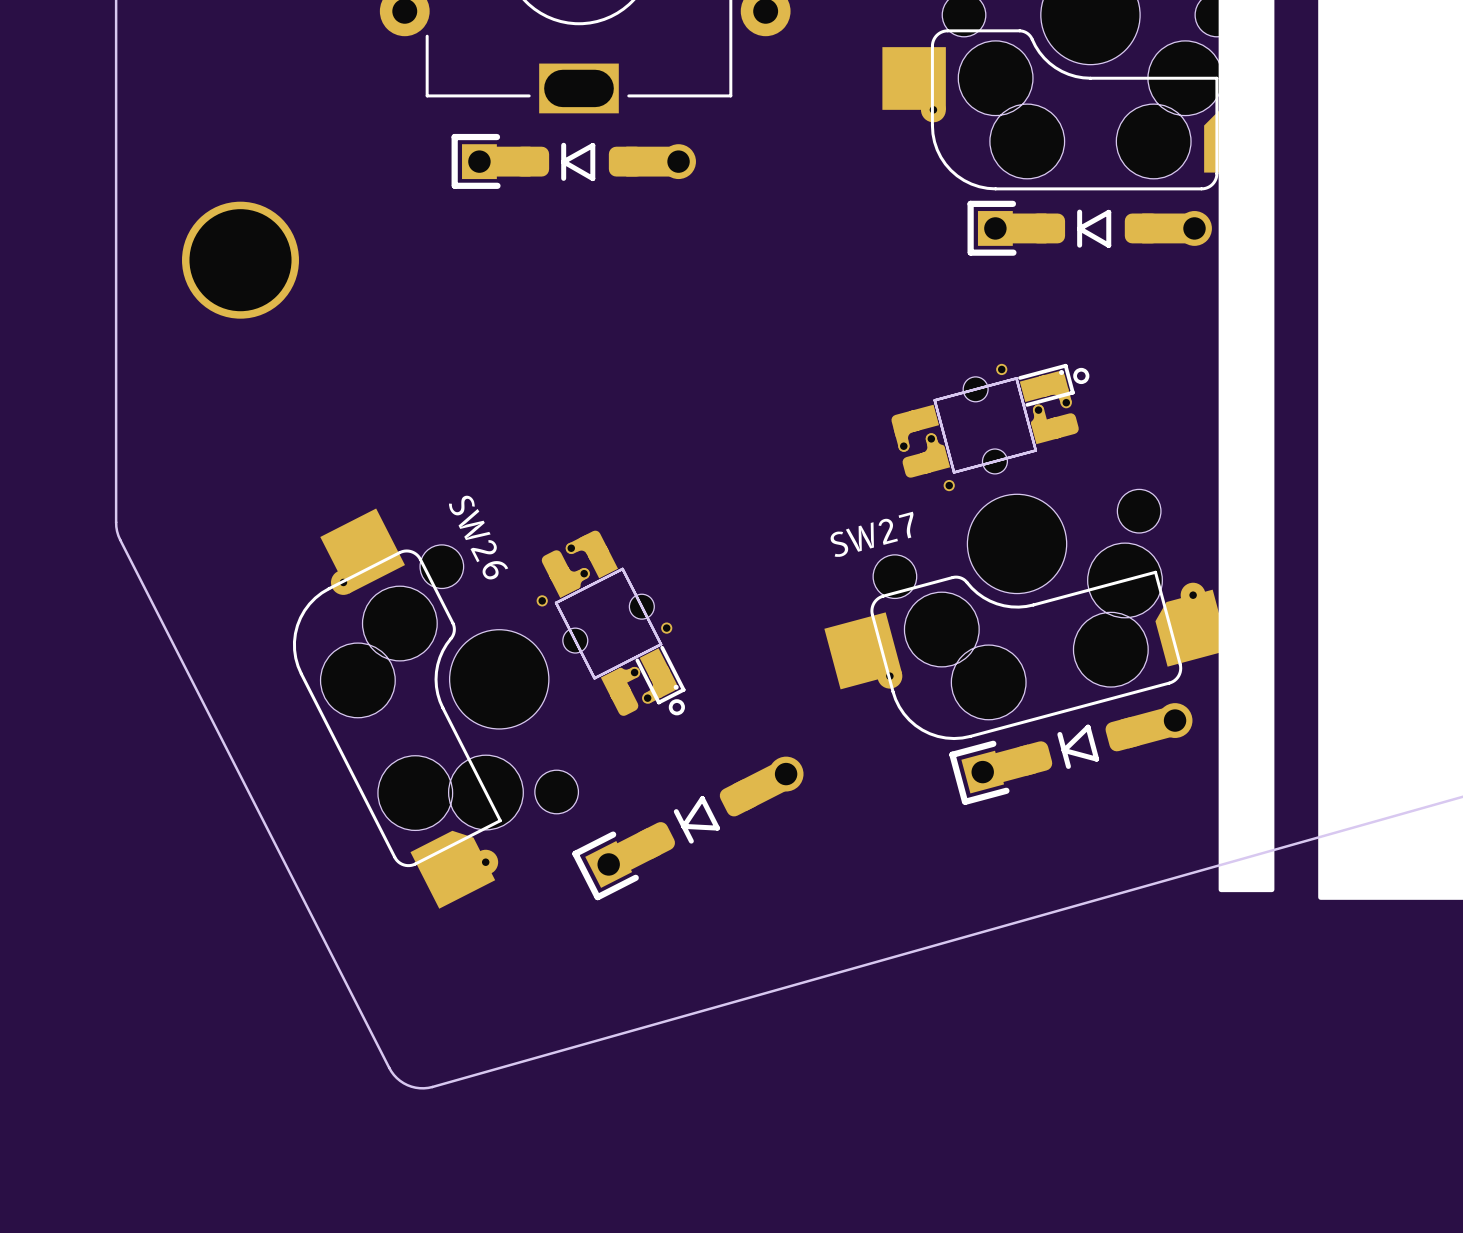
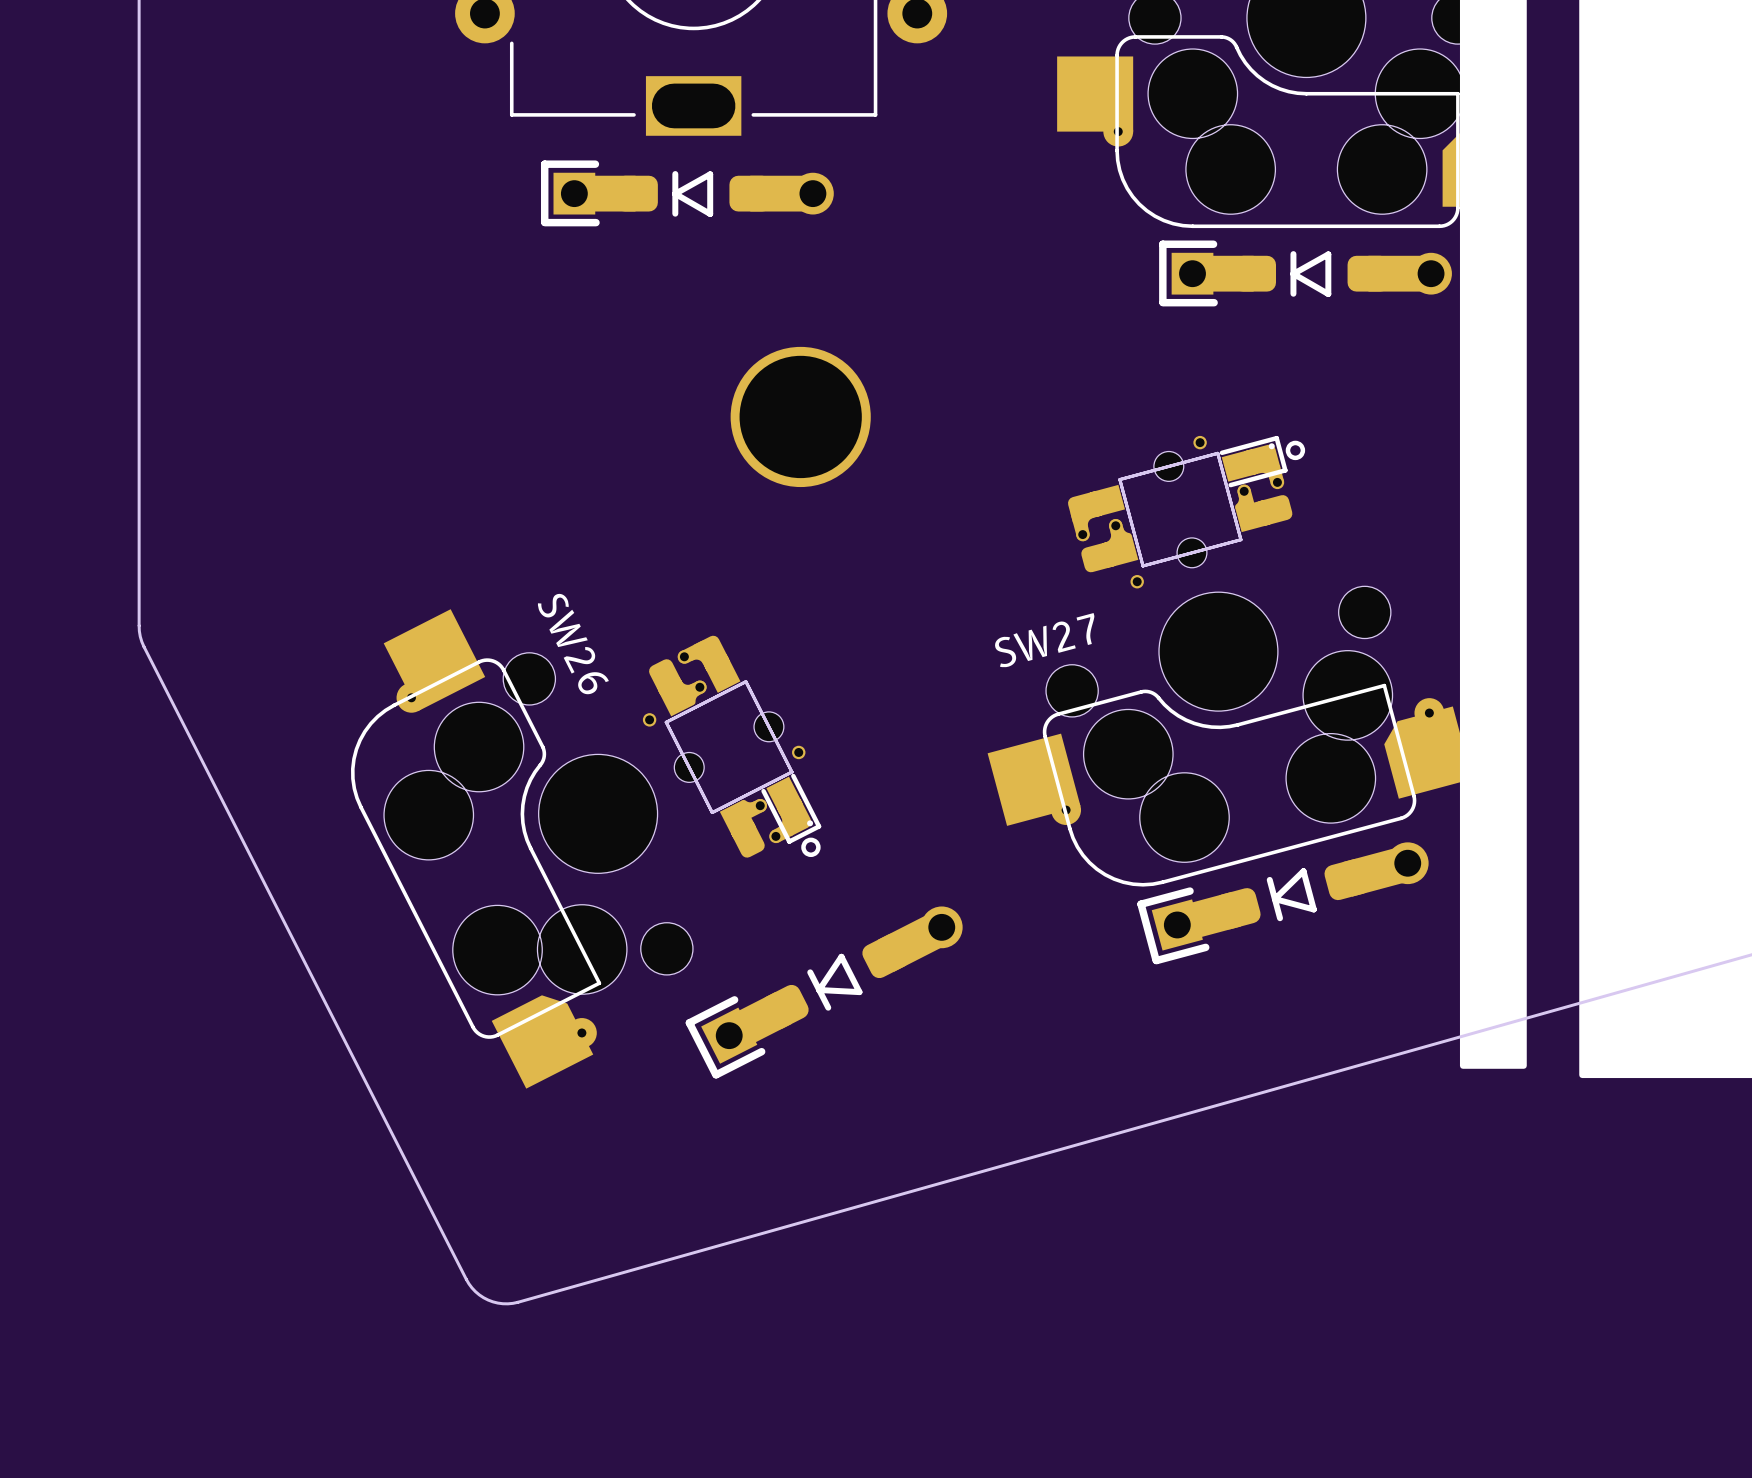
part position: (240, 260) -> (800, 416)

